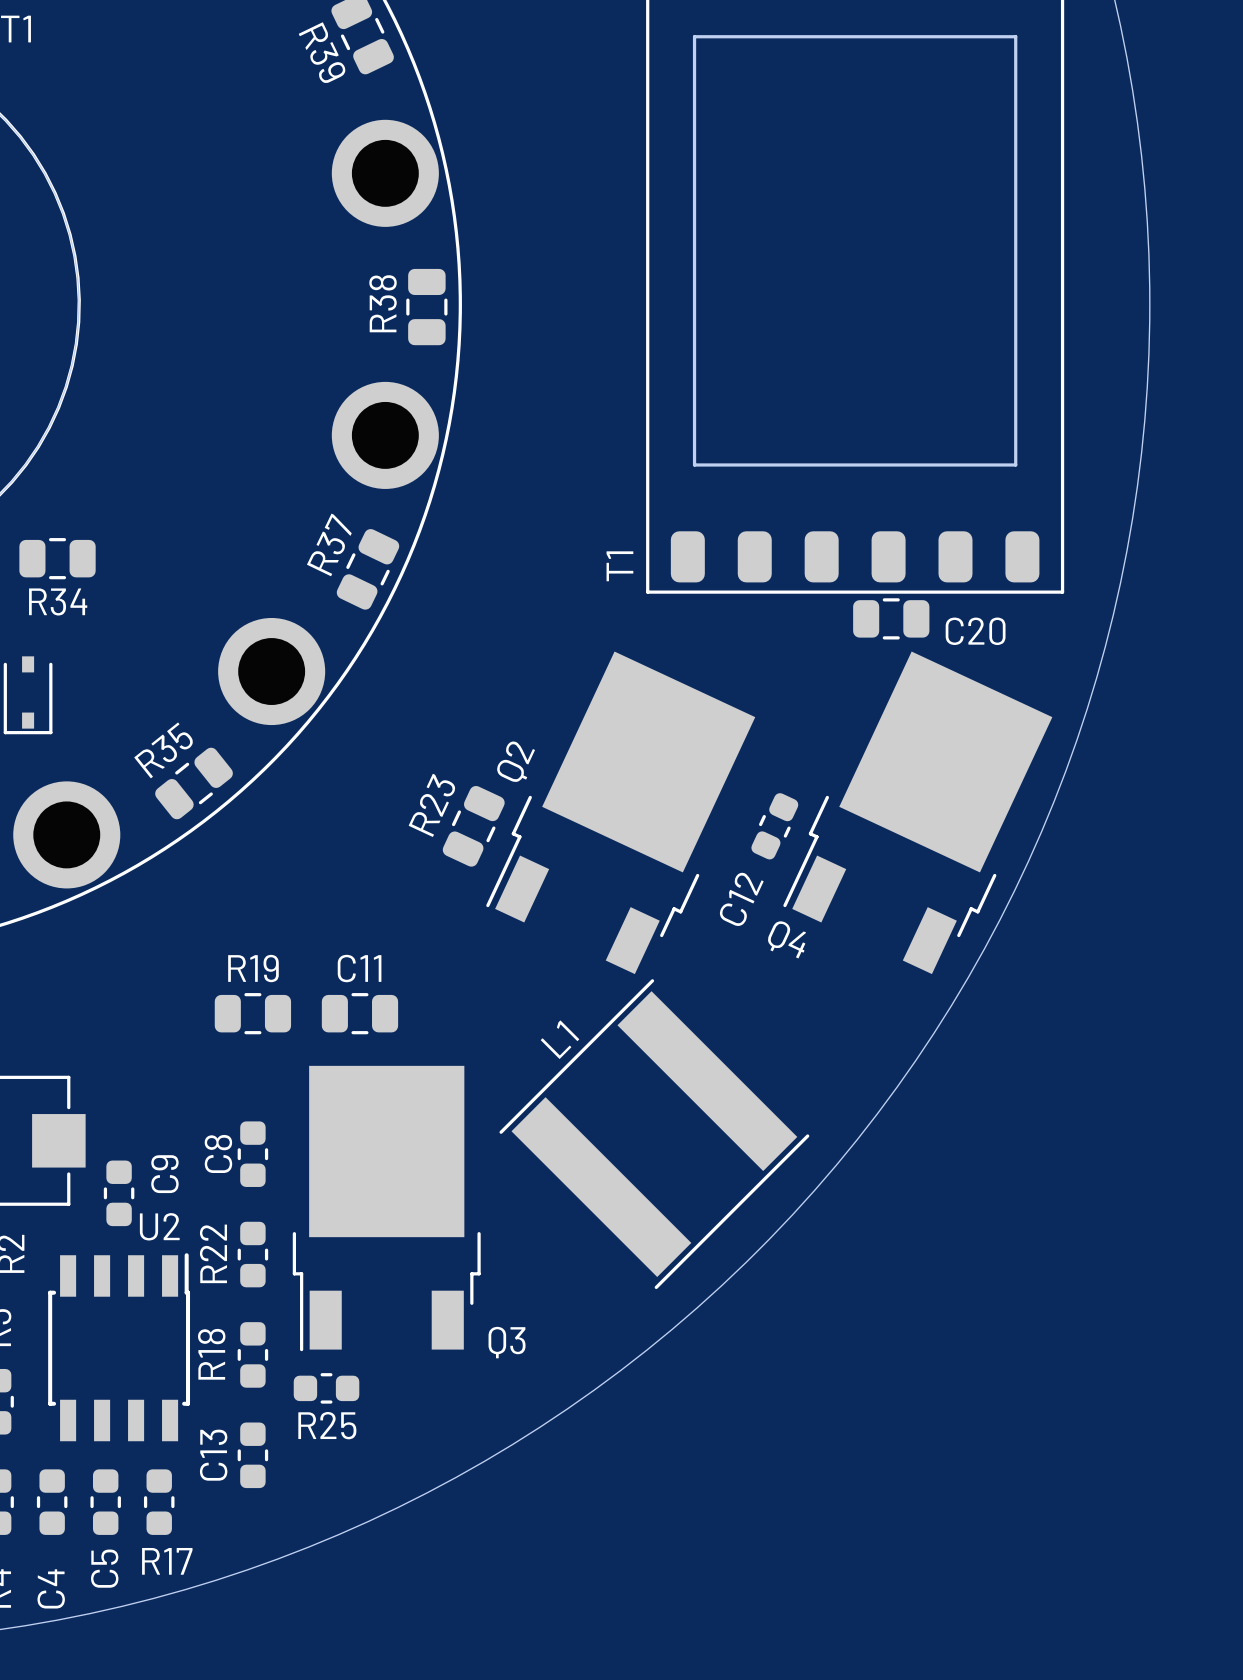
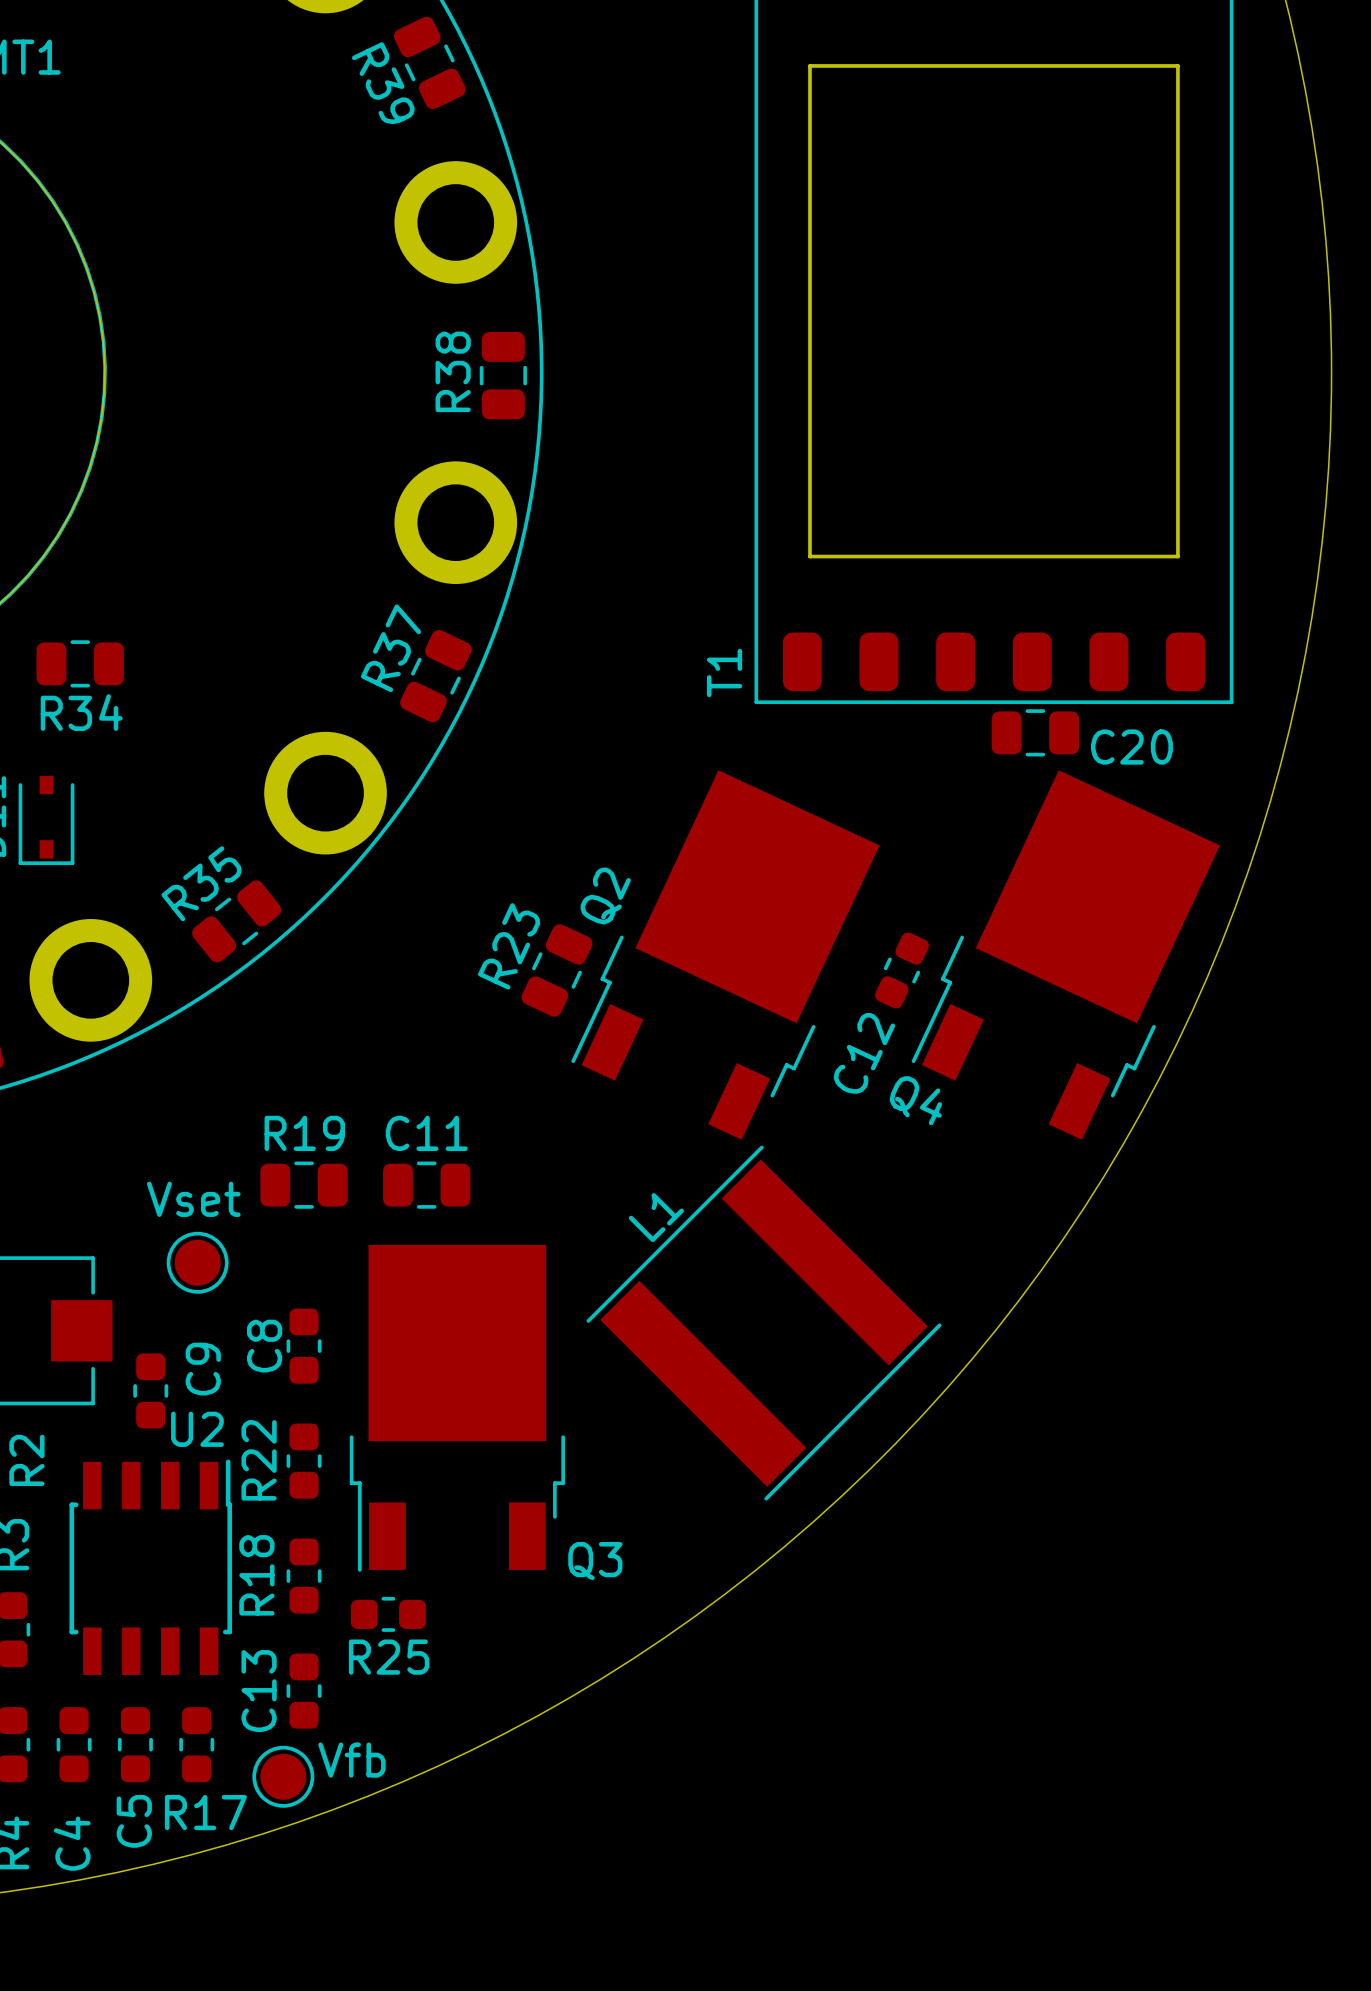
part: none -> Vset (197, 1262)
part: none -> Vfb (283, 1776)

